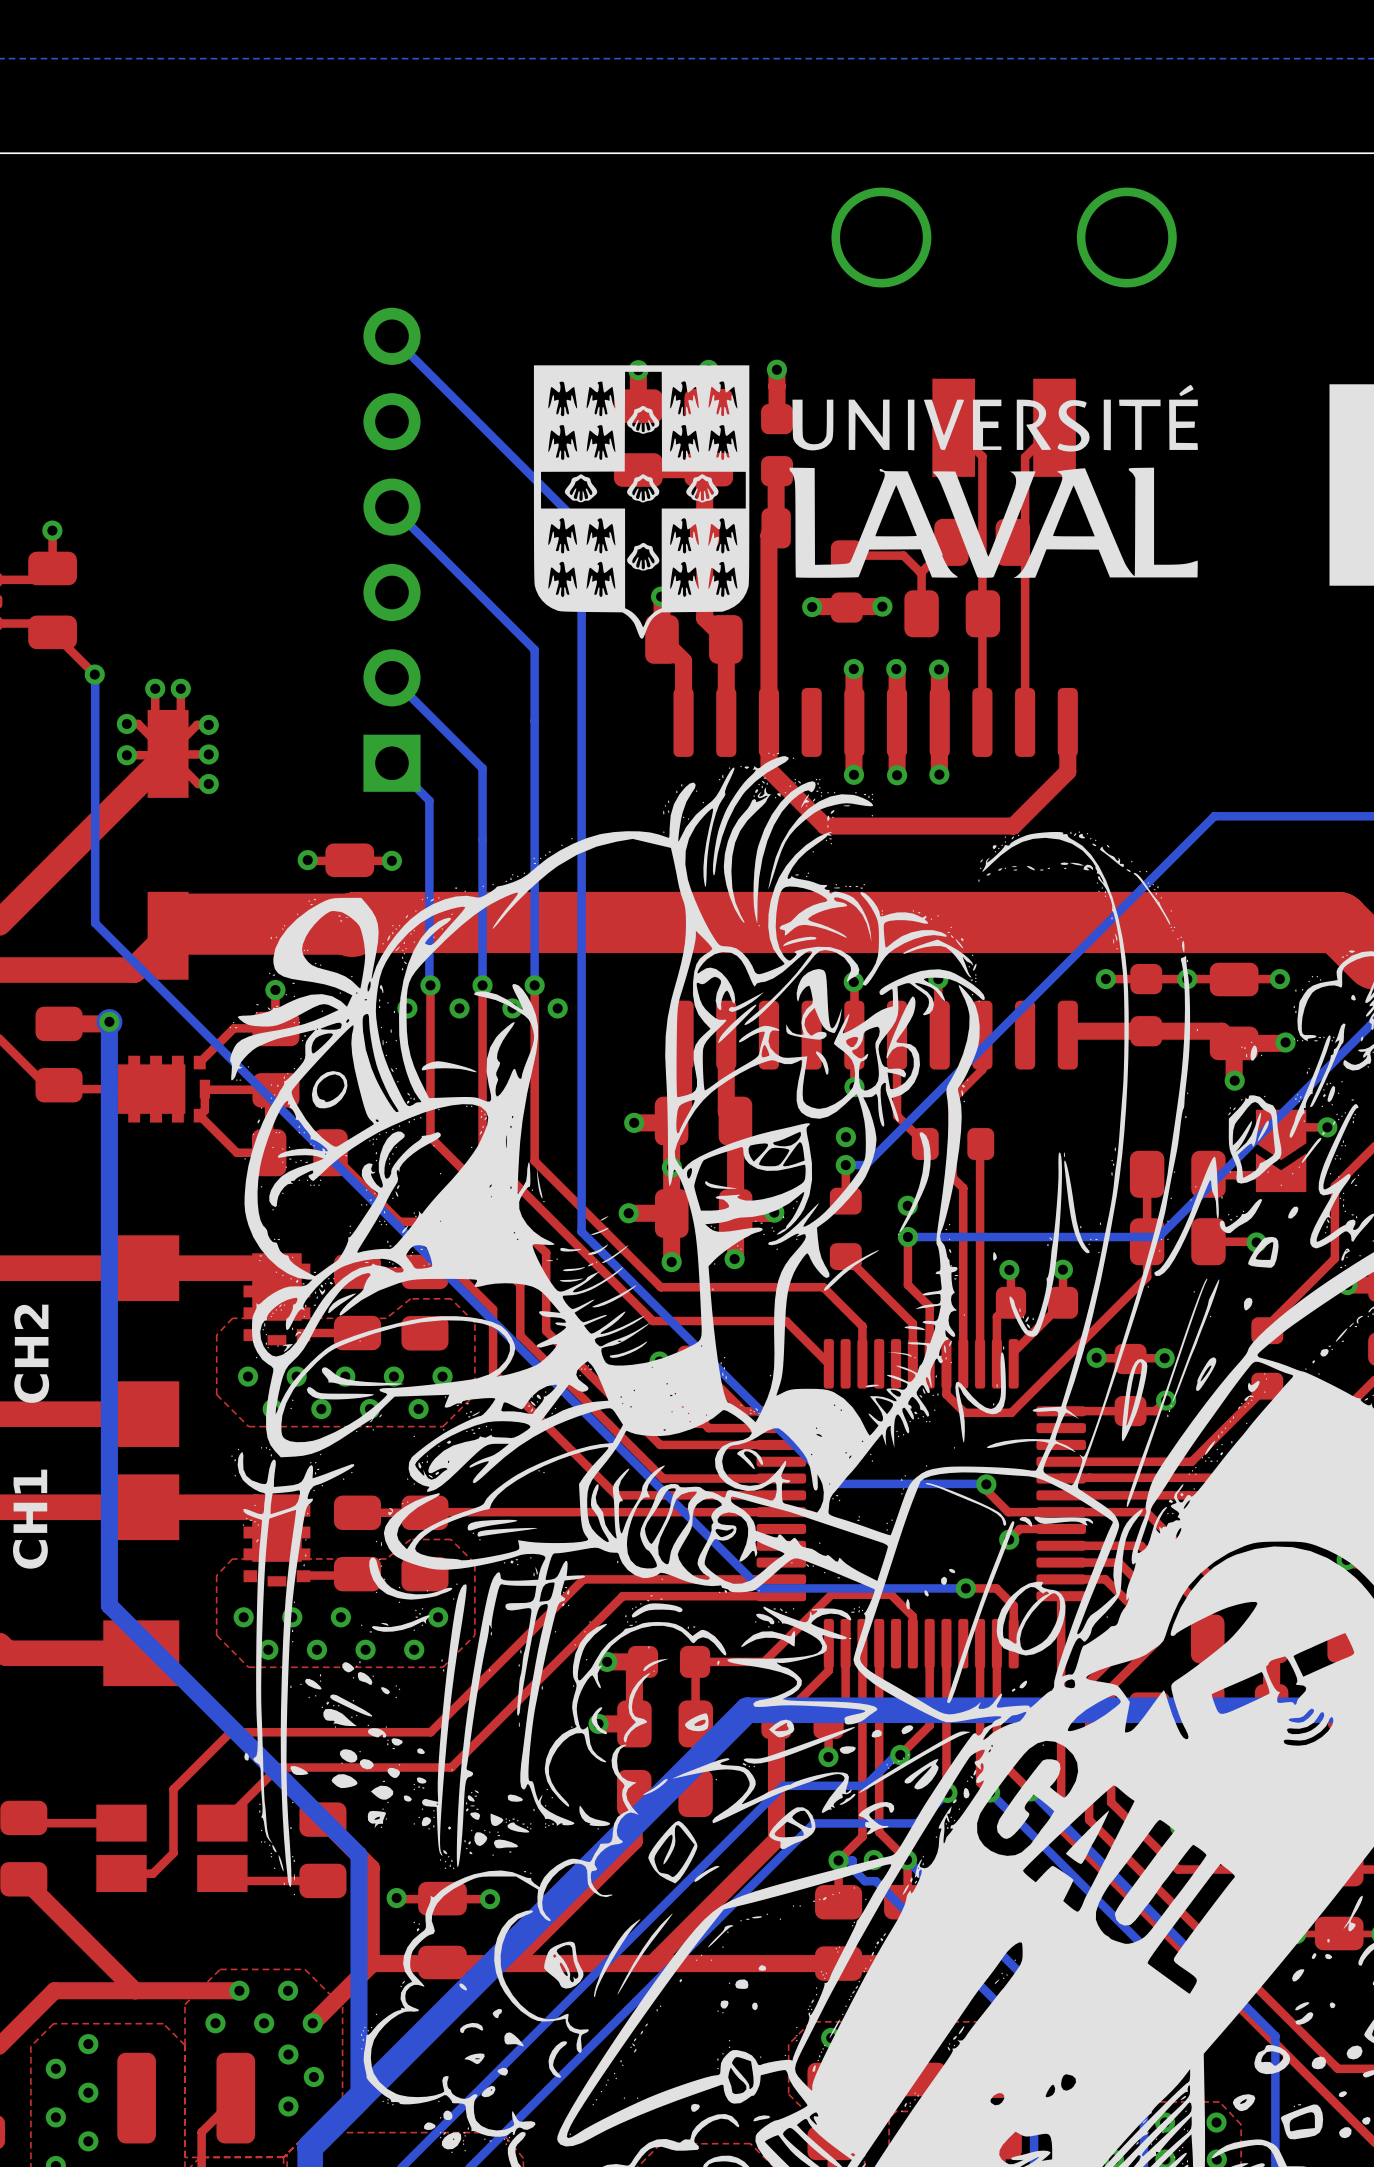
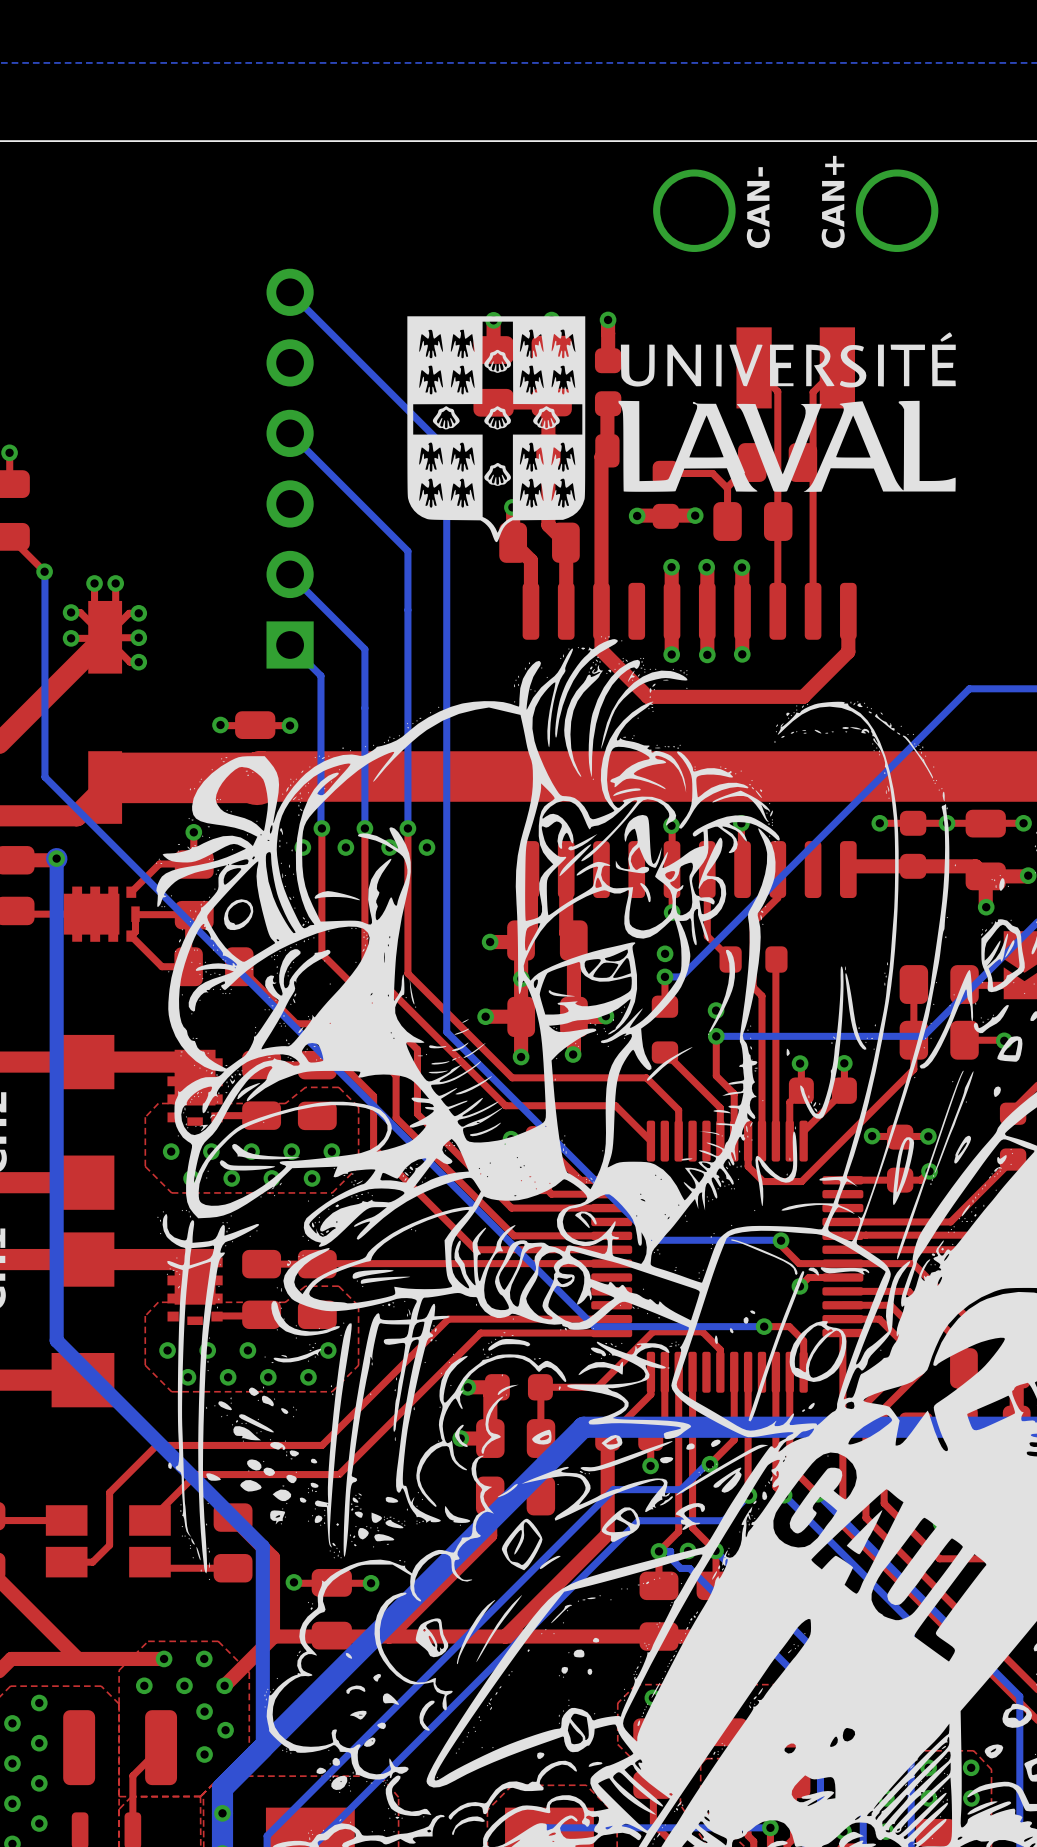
text: none -> CAN+ (833, 201)
text: none -> CAN- (758, 207)

